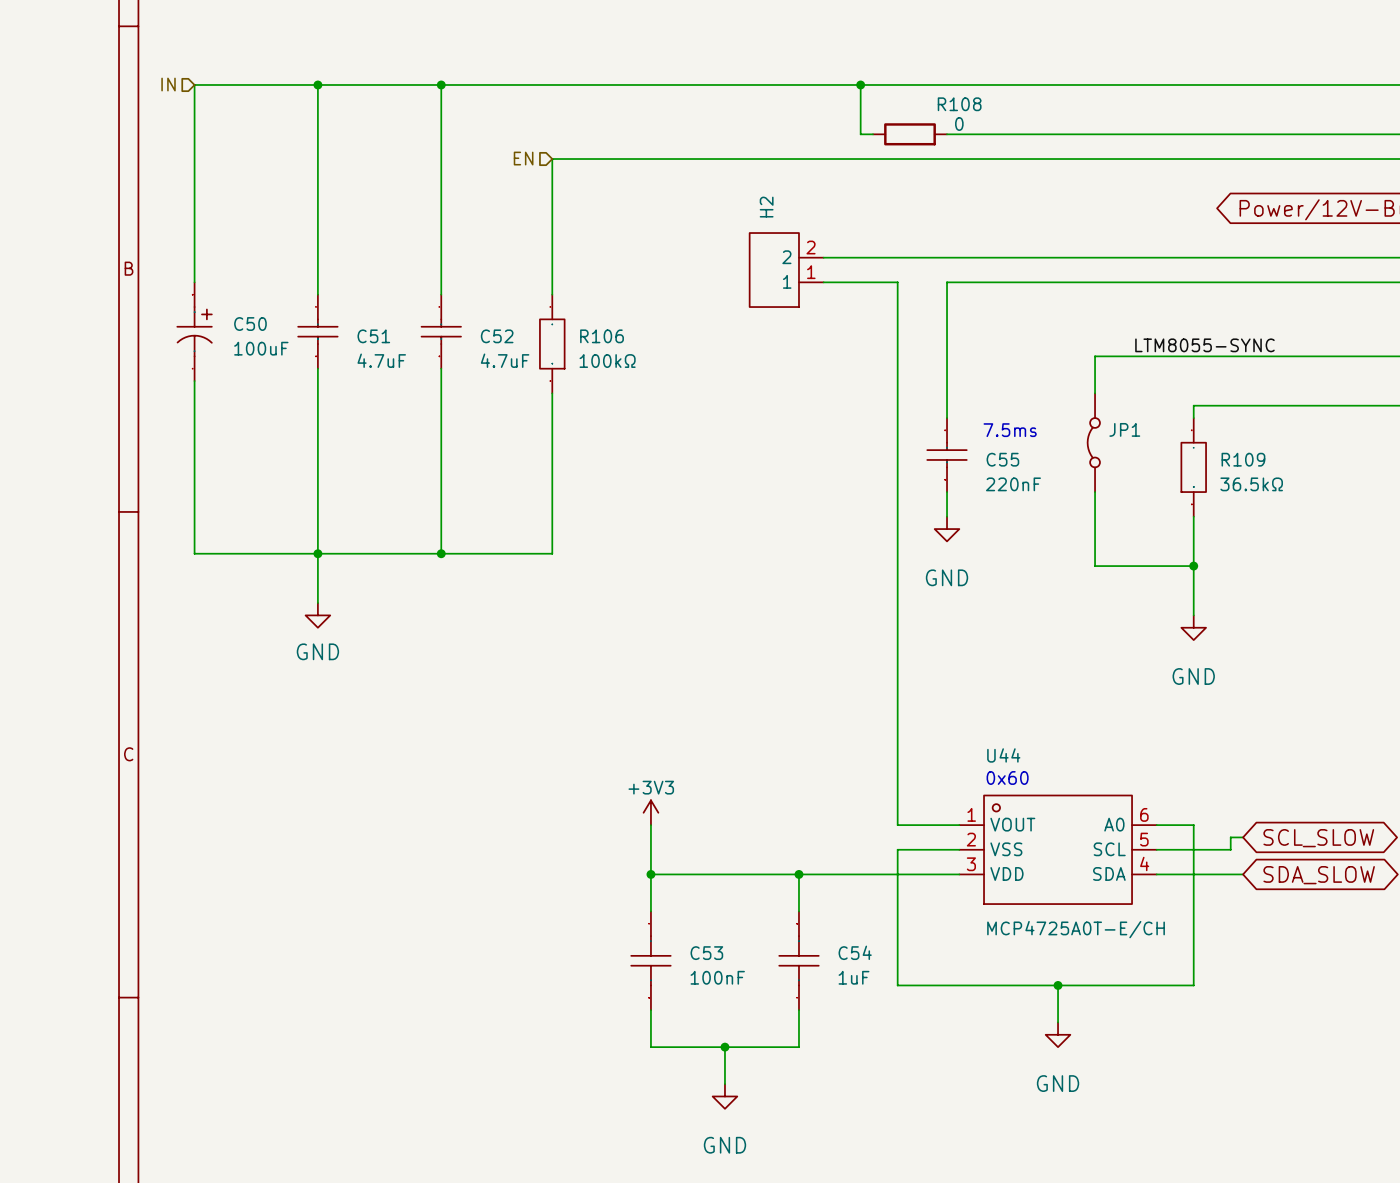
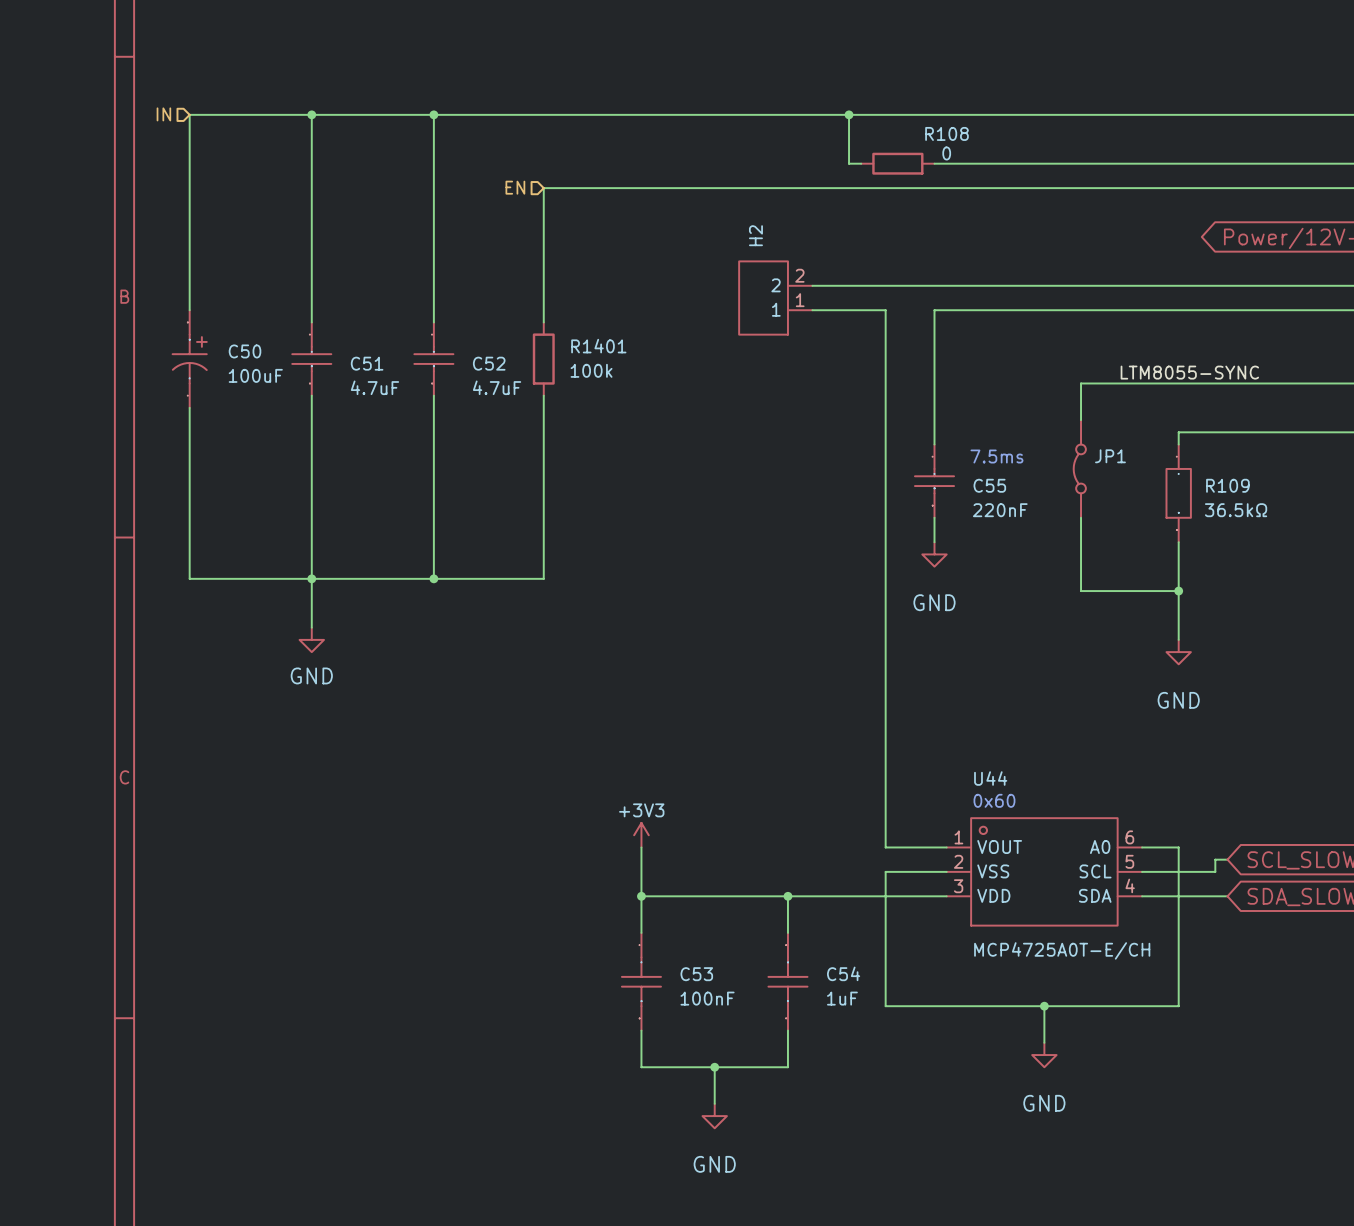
R1401: none -> 100k (543, 359)
R106: 100kΩ (552, 344) -> none

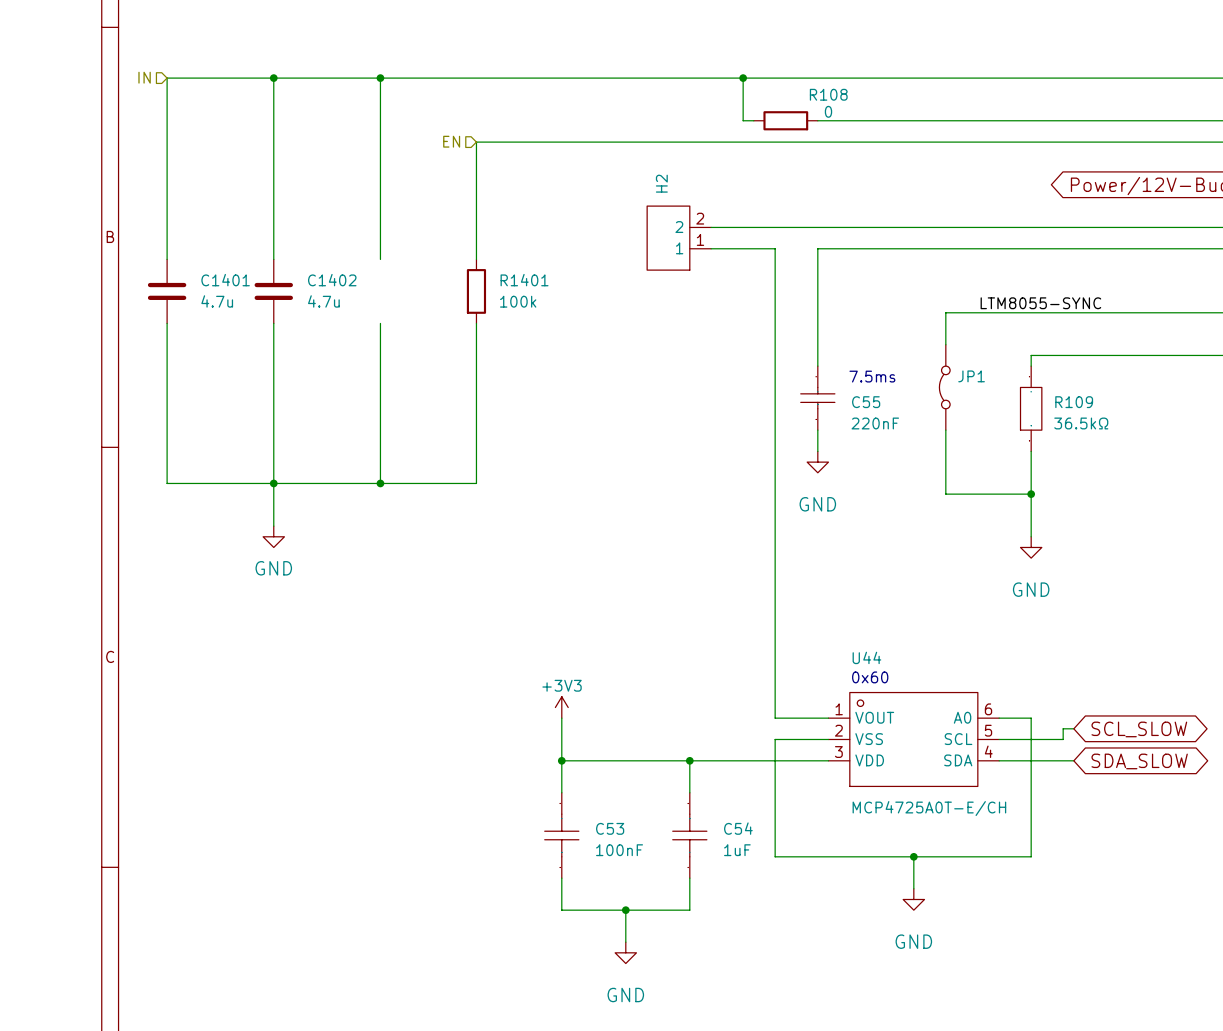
C50: 100uF (189, 359) -> none
C1401: none -> 4.7u (167, 291)
C51: 4.7uF (311, 359) -> none
C1402: none -> 4.7u (273, 291)
C52: 4.7uF (433, 359) -> none

